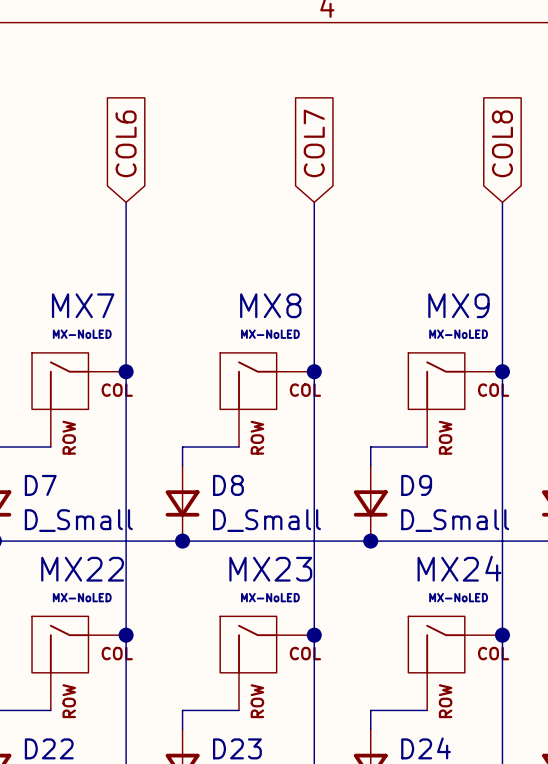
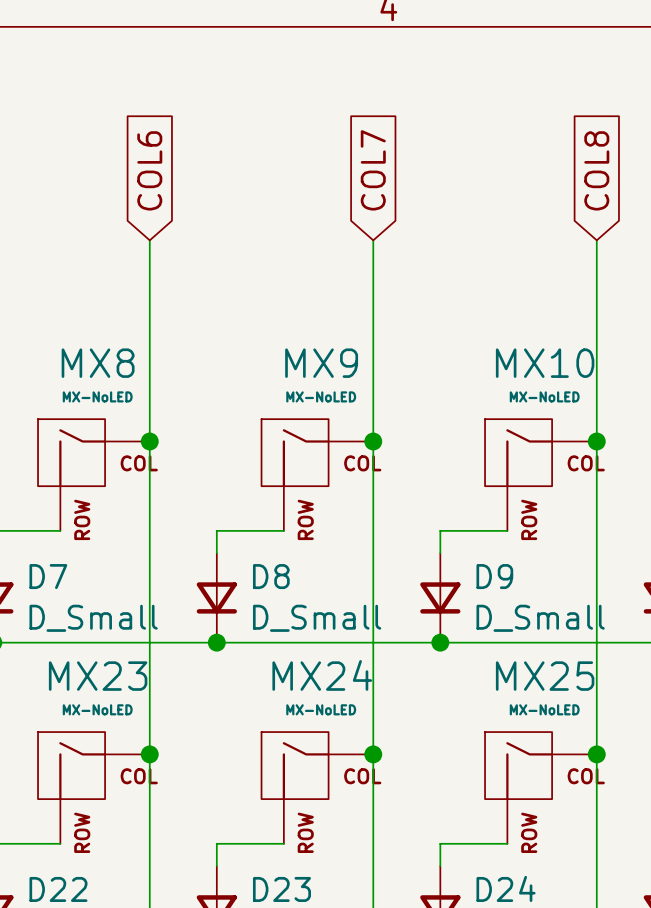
MX7 name: MX7 (83, 305) -> MX8 (98, 363)
MX8 name: MX8 (270, 305) -> MX9 (321, 363)
MX9 name: MX9 (458, 305) -> MX10 (545, 363)
MX24 name: MX24 (459, 568) -> MX25 (545, 676)
MX22 name: MX22 (82, 569) -> MX23 (98, 676)
MX23 name: MX23 (270, 569) -> MX24 (322, 675)

